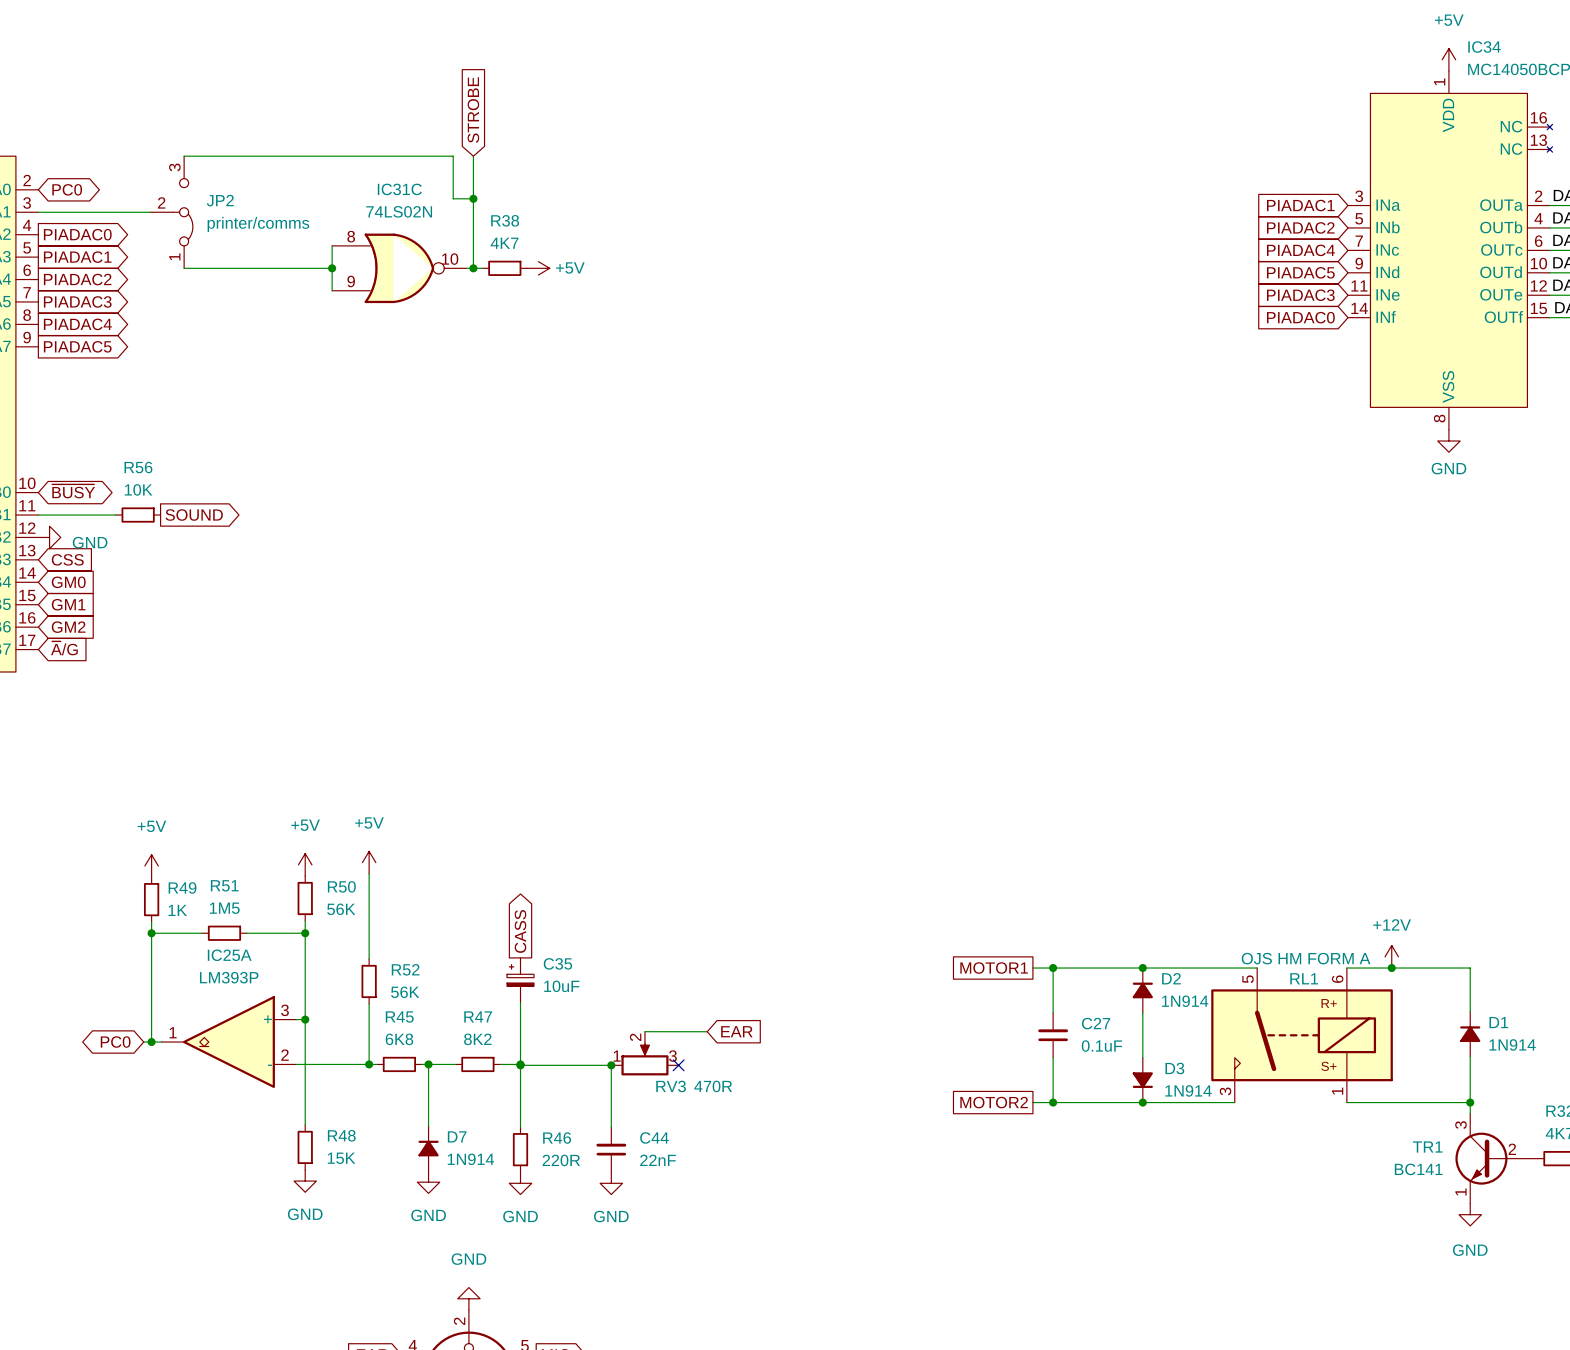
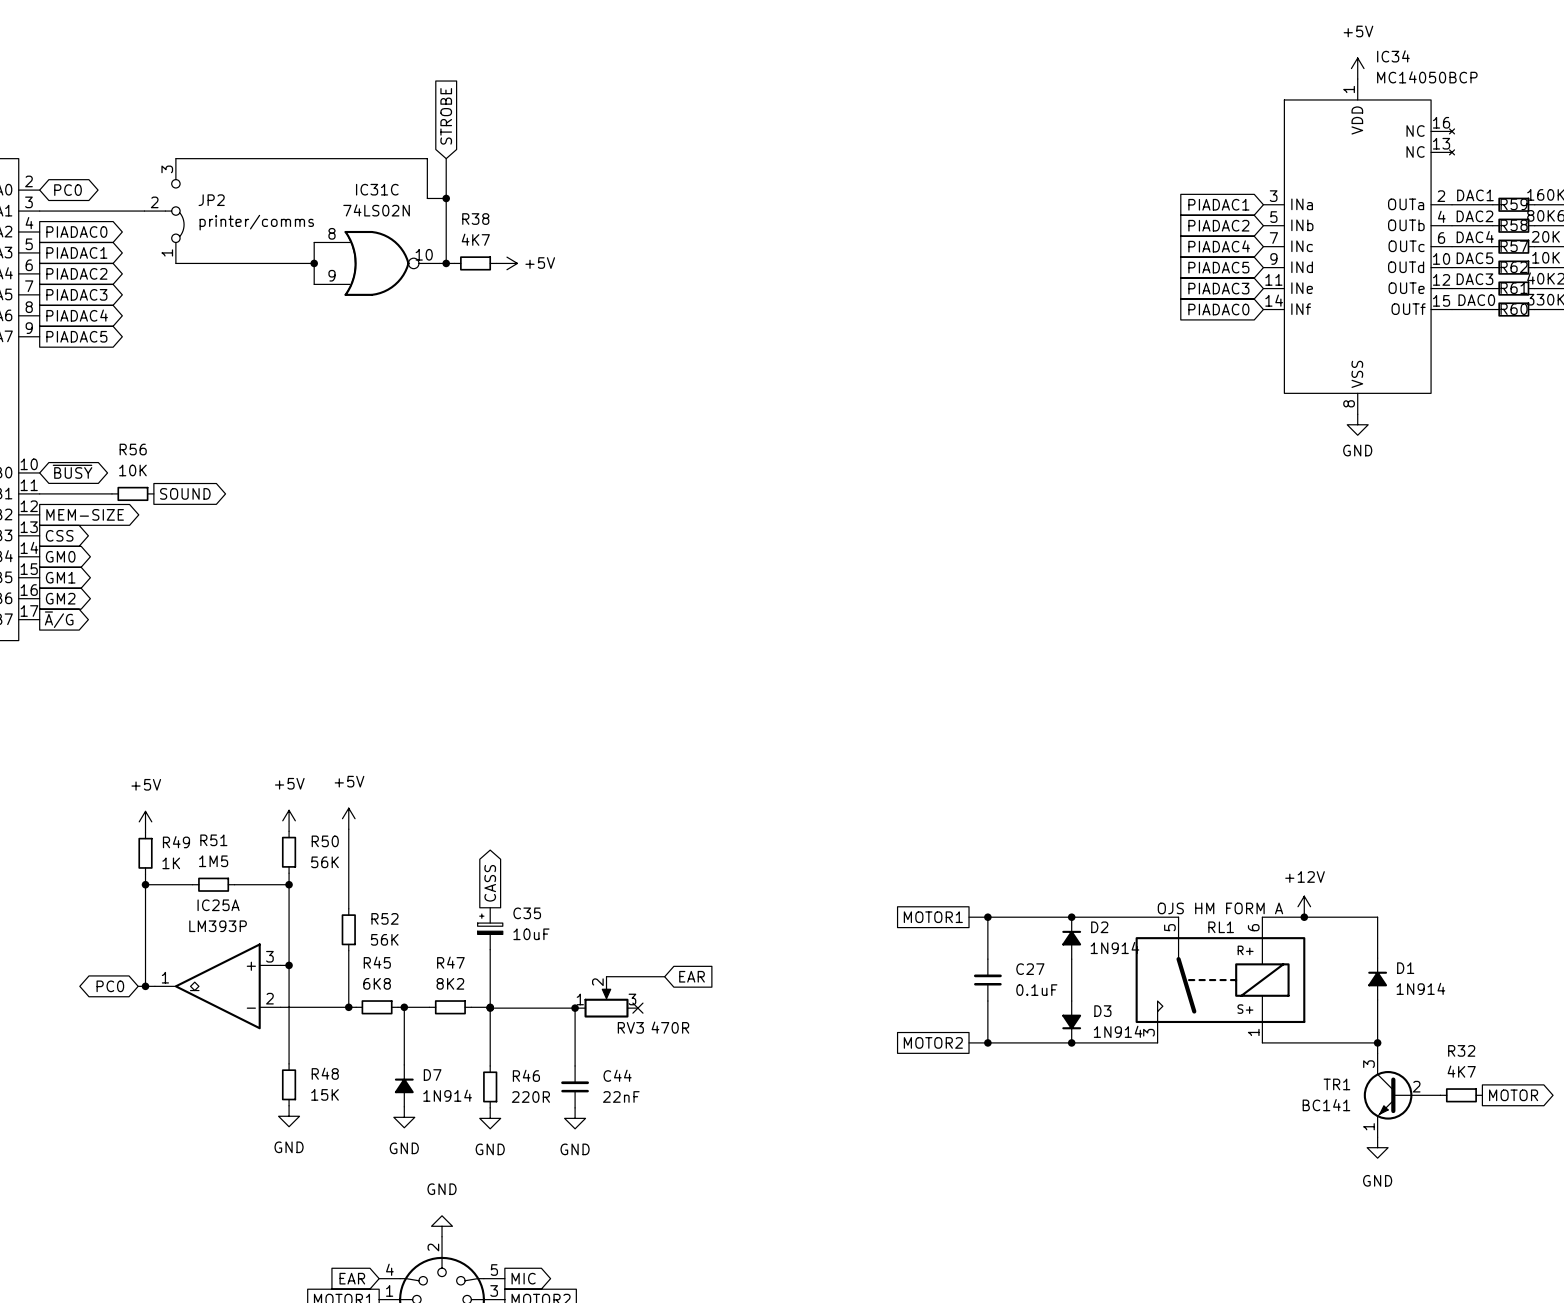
power symbol: GND (49, 537) -> none
global label: none -> MEM-SIZE (85, 514)
global label shape: input (67, 559) -> output (59, 535)
global label shape: input (68, 582) -> output (60, 556)
global label shape: input (68, 604) -> output (60, 577)
global label shape: input (68, 627) -> output (60, 598)
global label shape: input (64, 648) -> output (59, 619)

